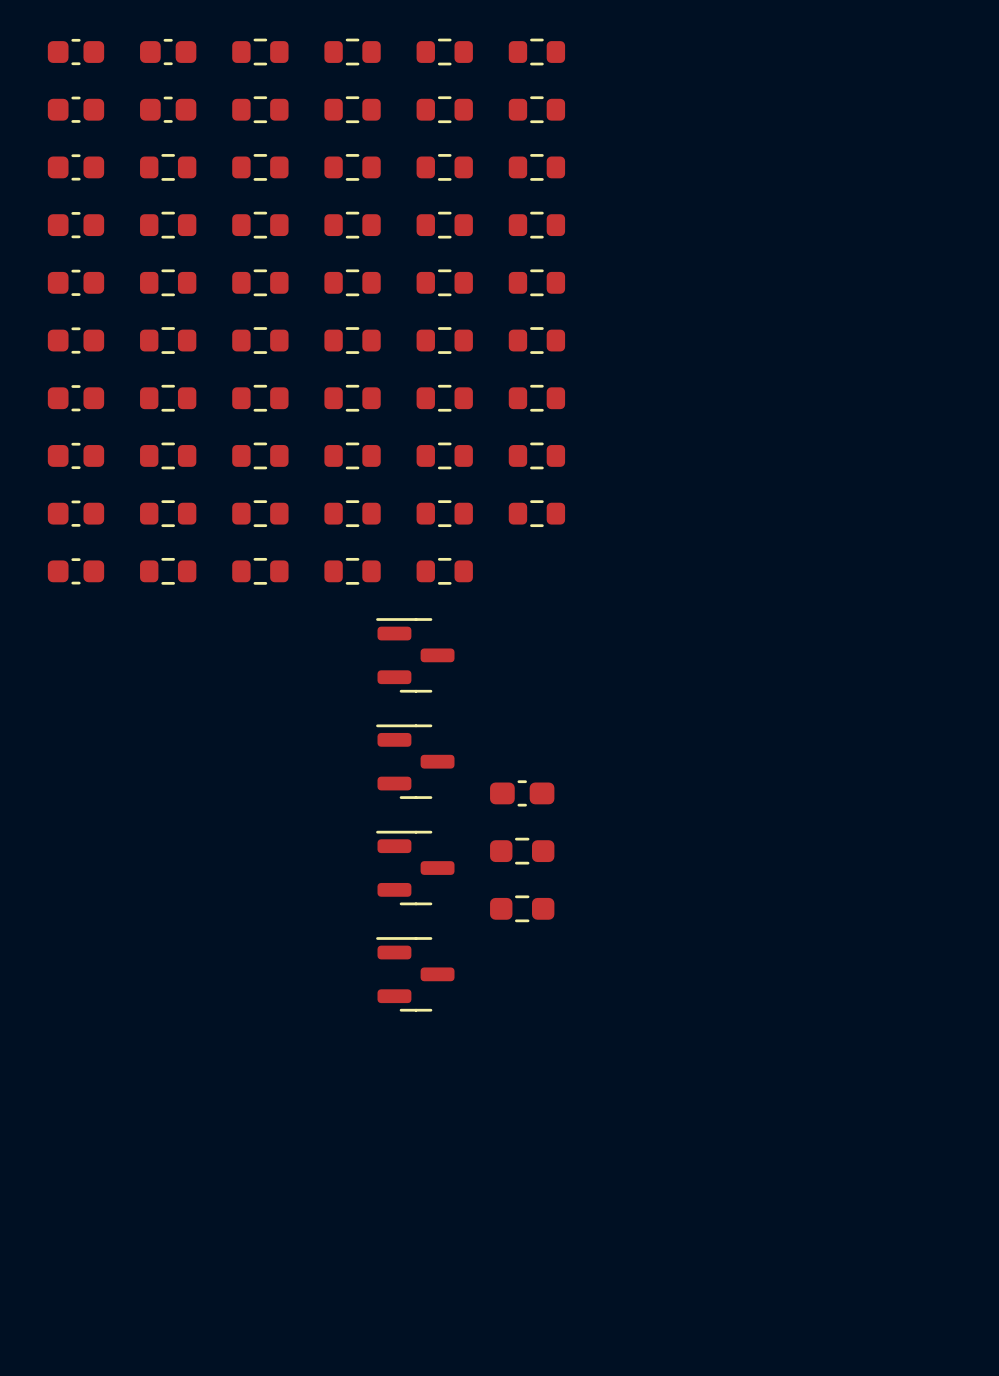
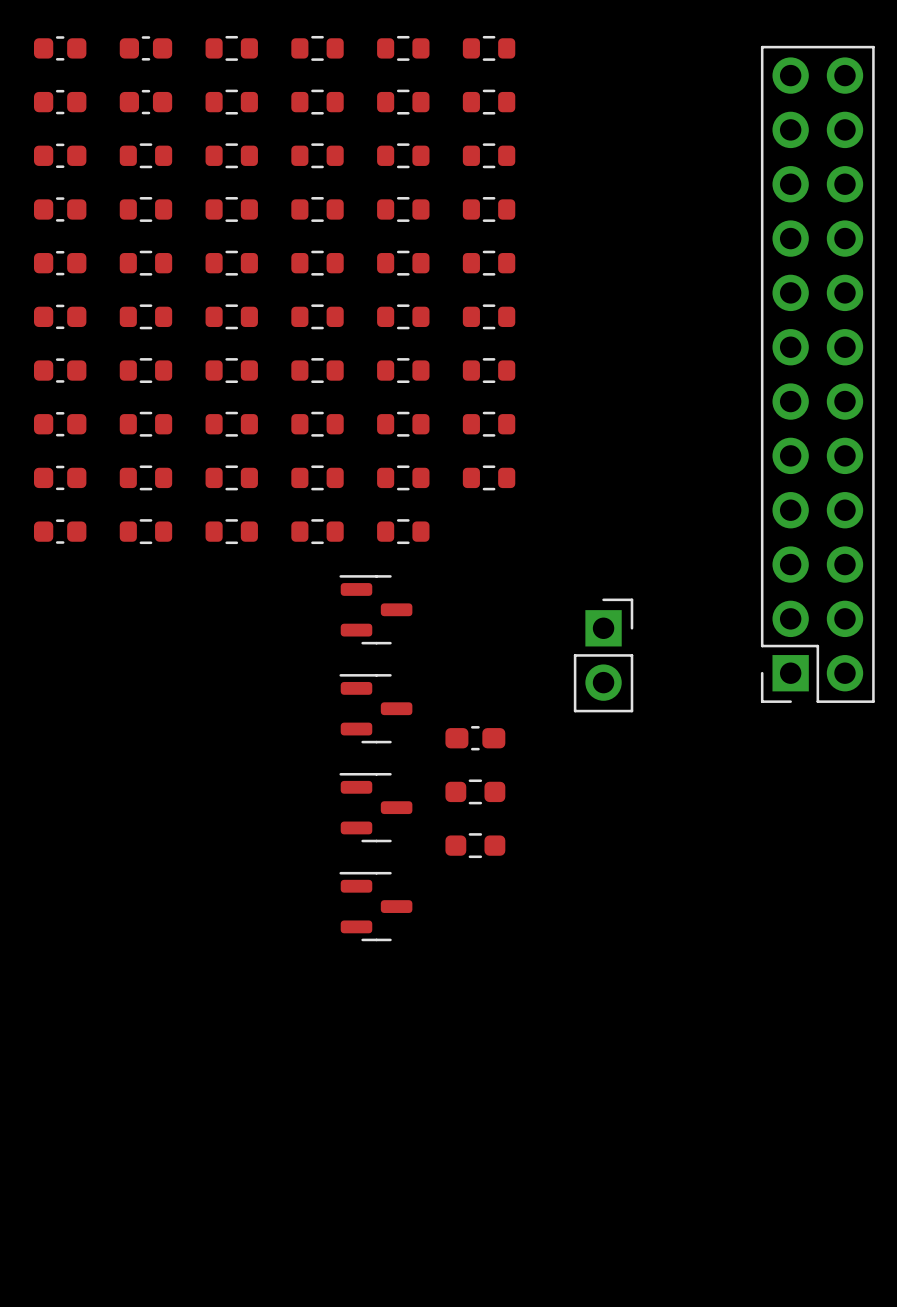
part: none -> (817, 374)
part: none -> (603, 655)

